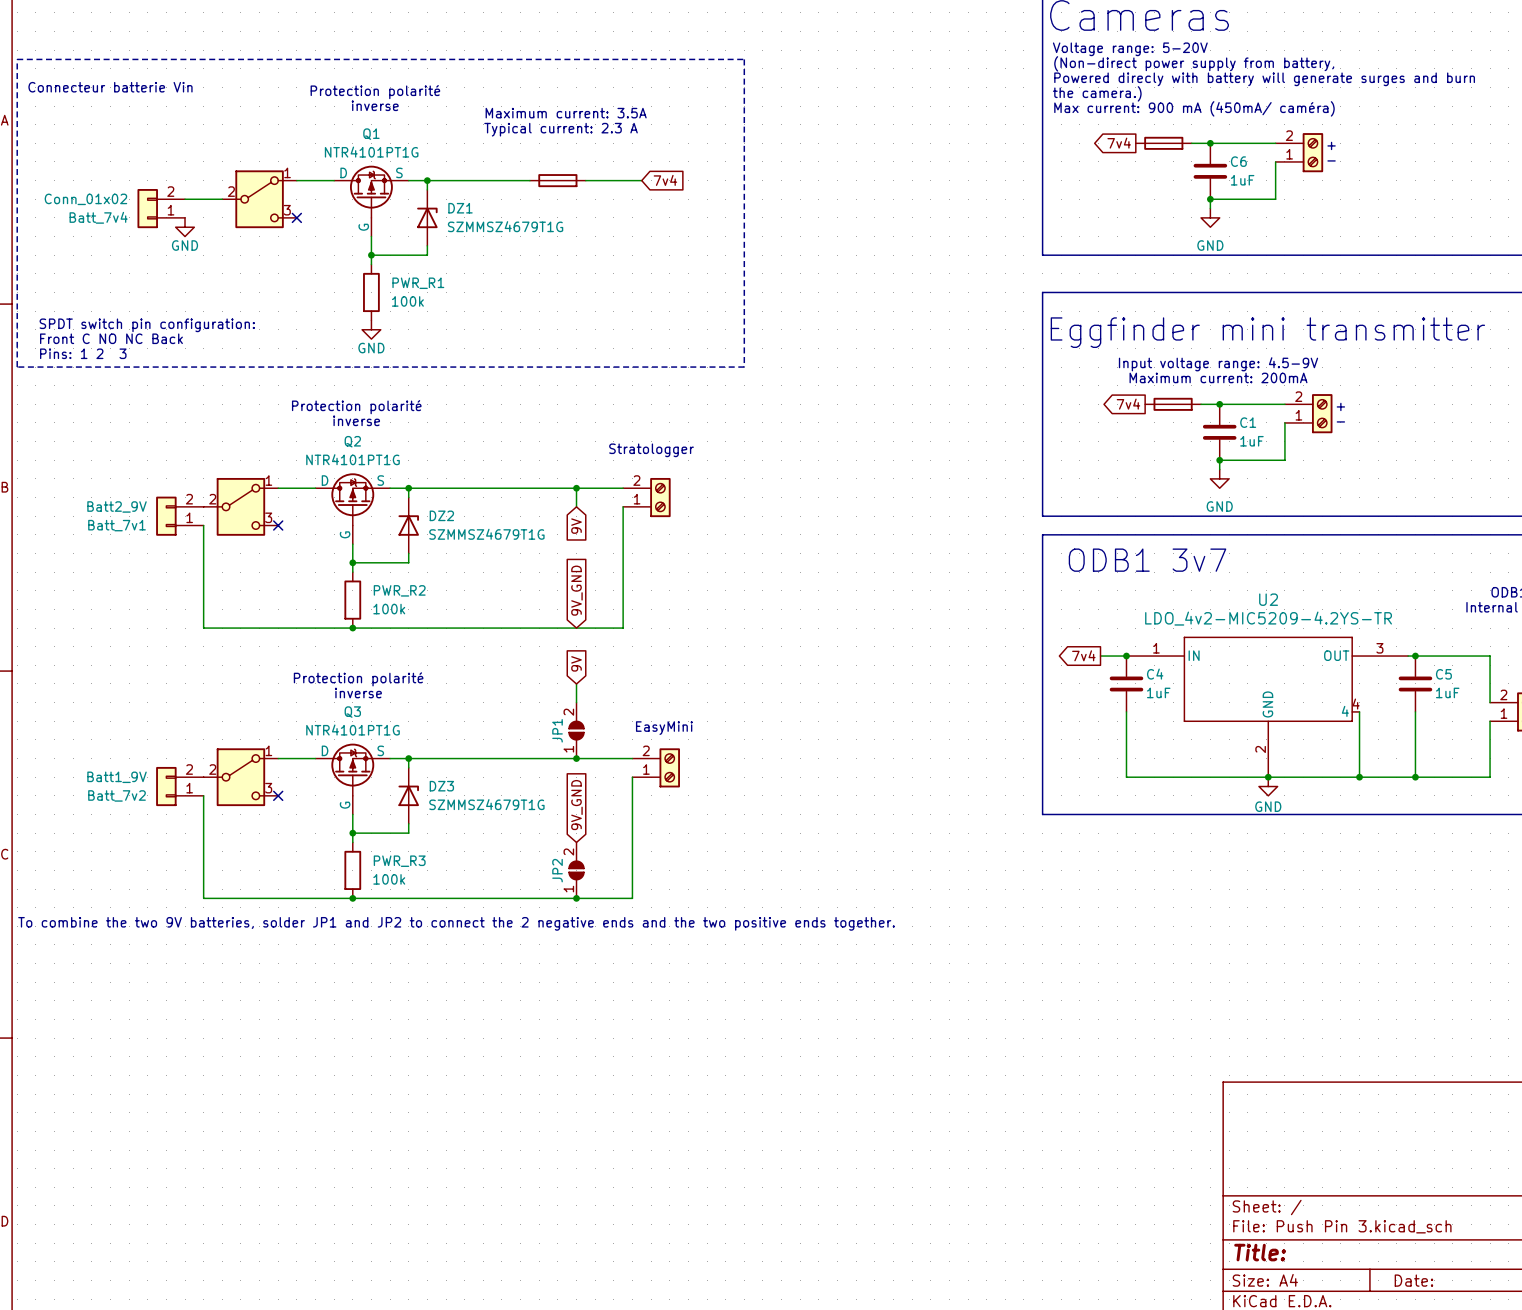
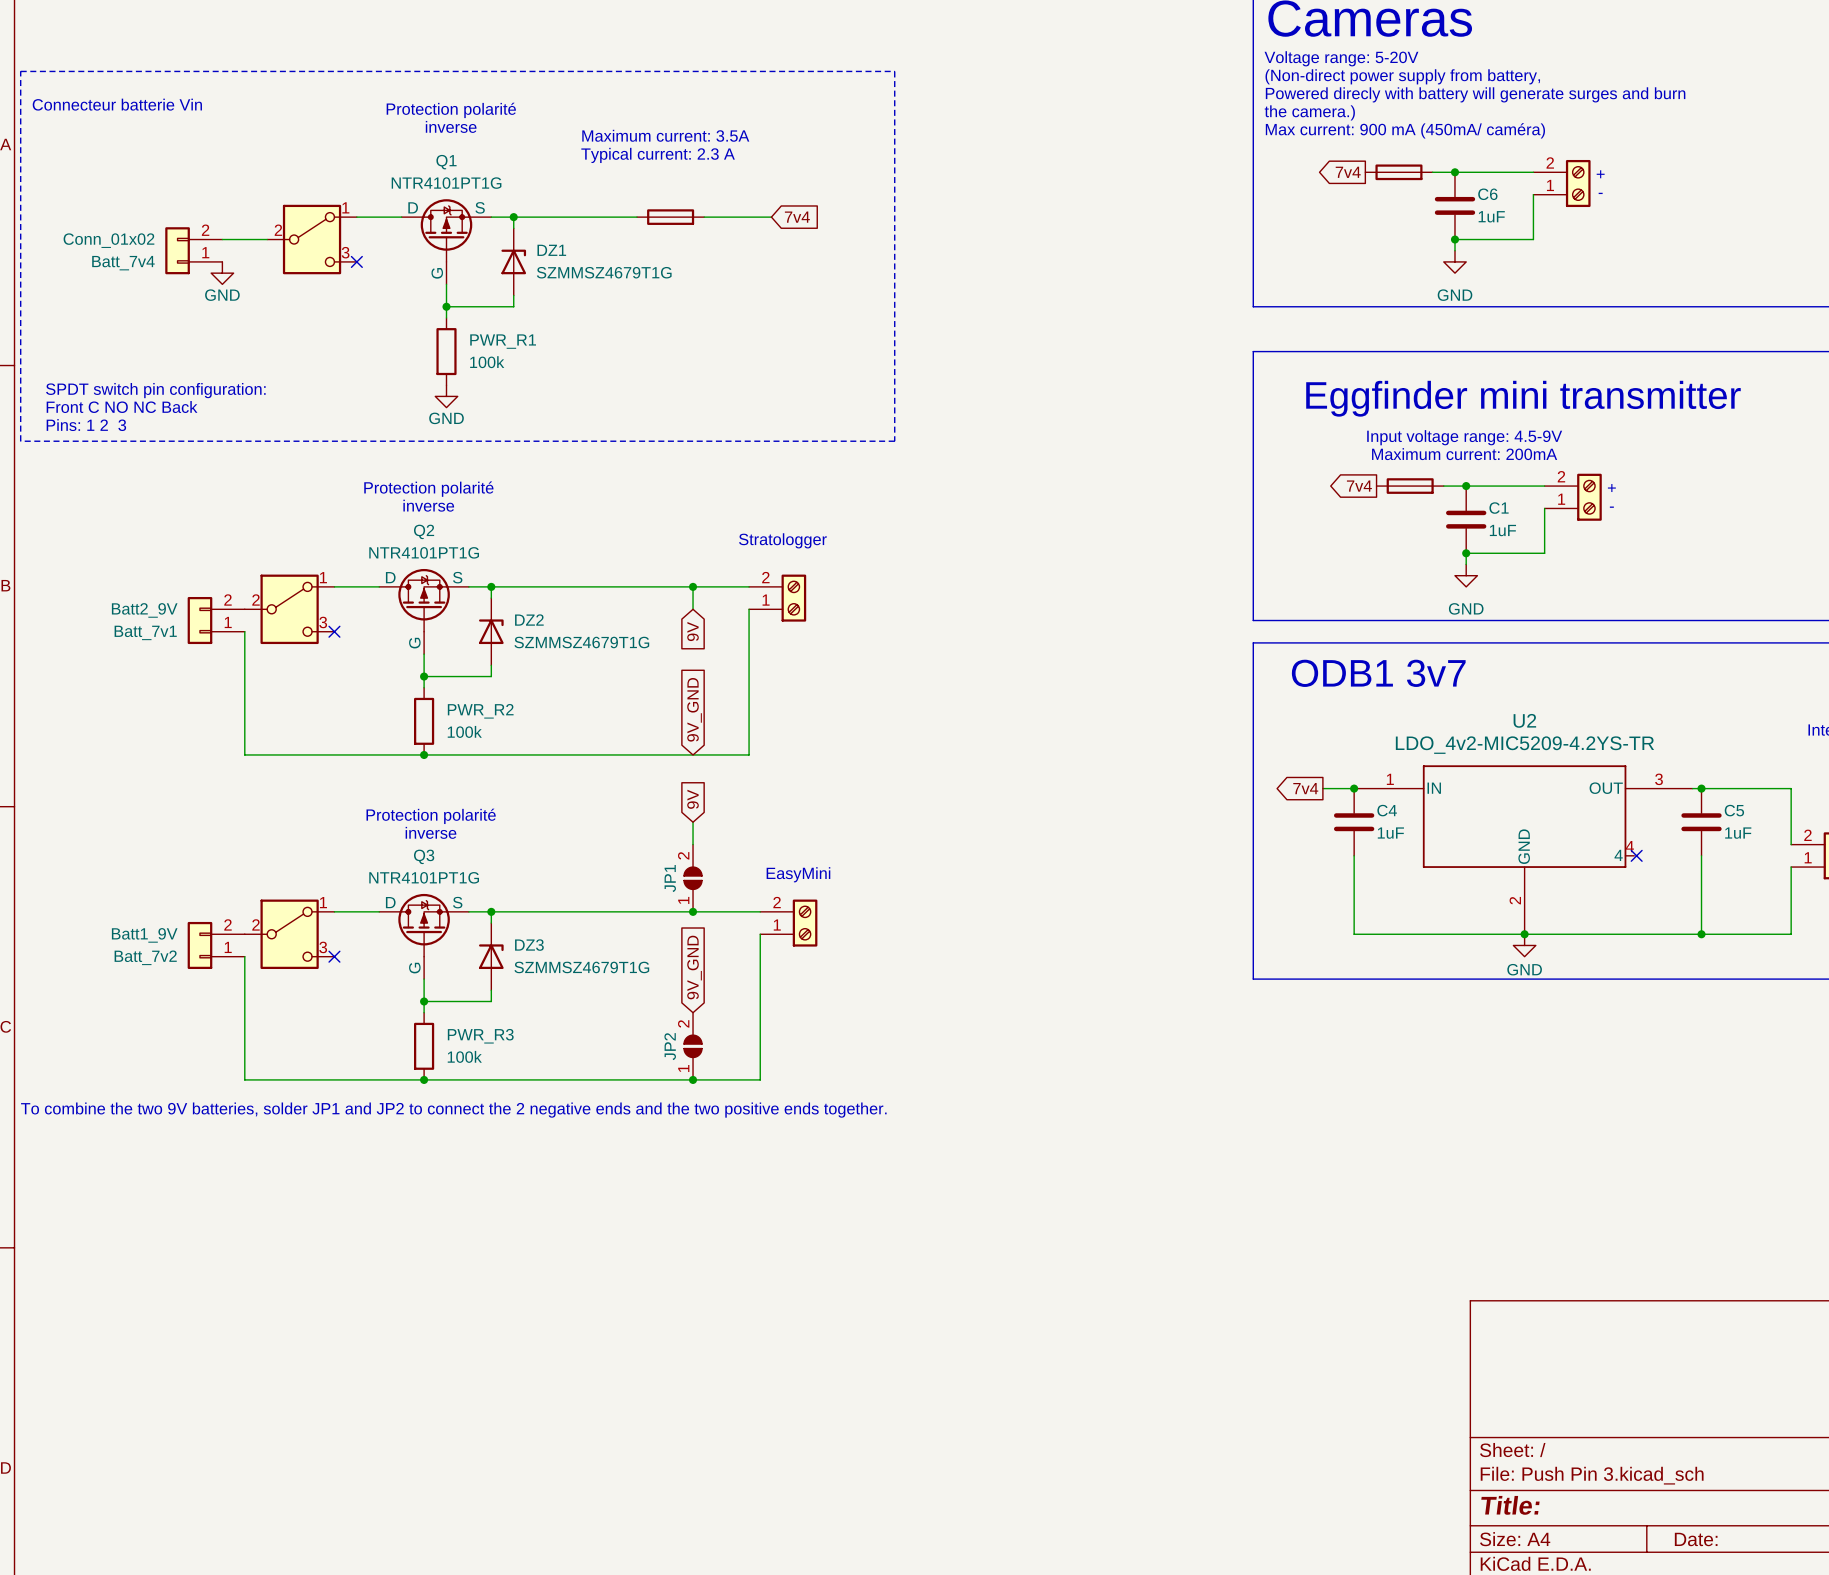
wire: (1359, 711) (1359, 777) -> none
no-connect mark: none -> (1636, 855)
junction: (1359, 777) -> none

